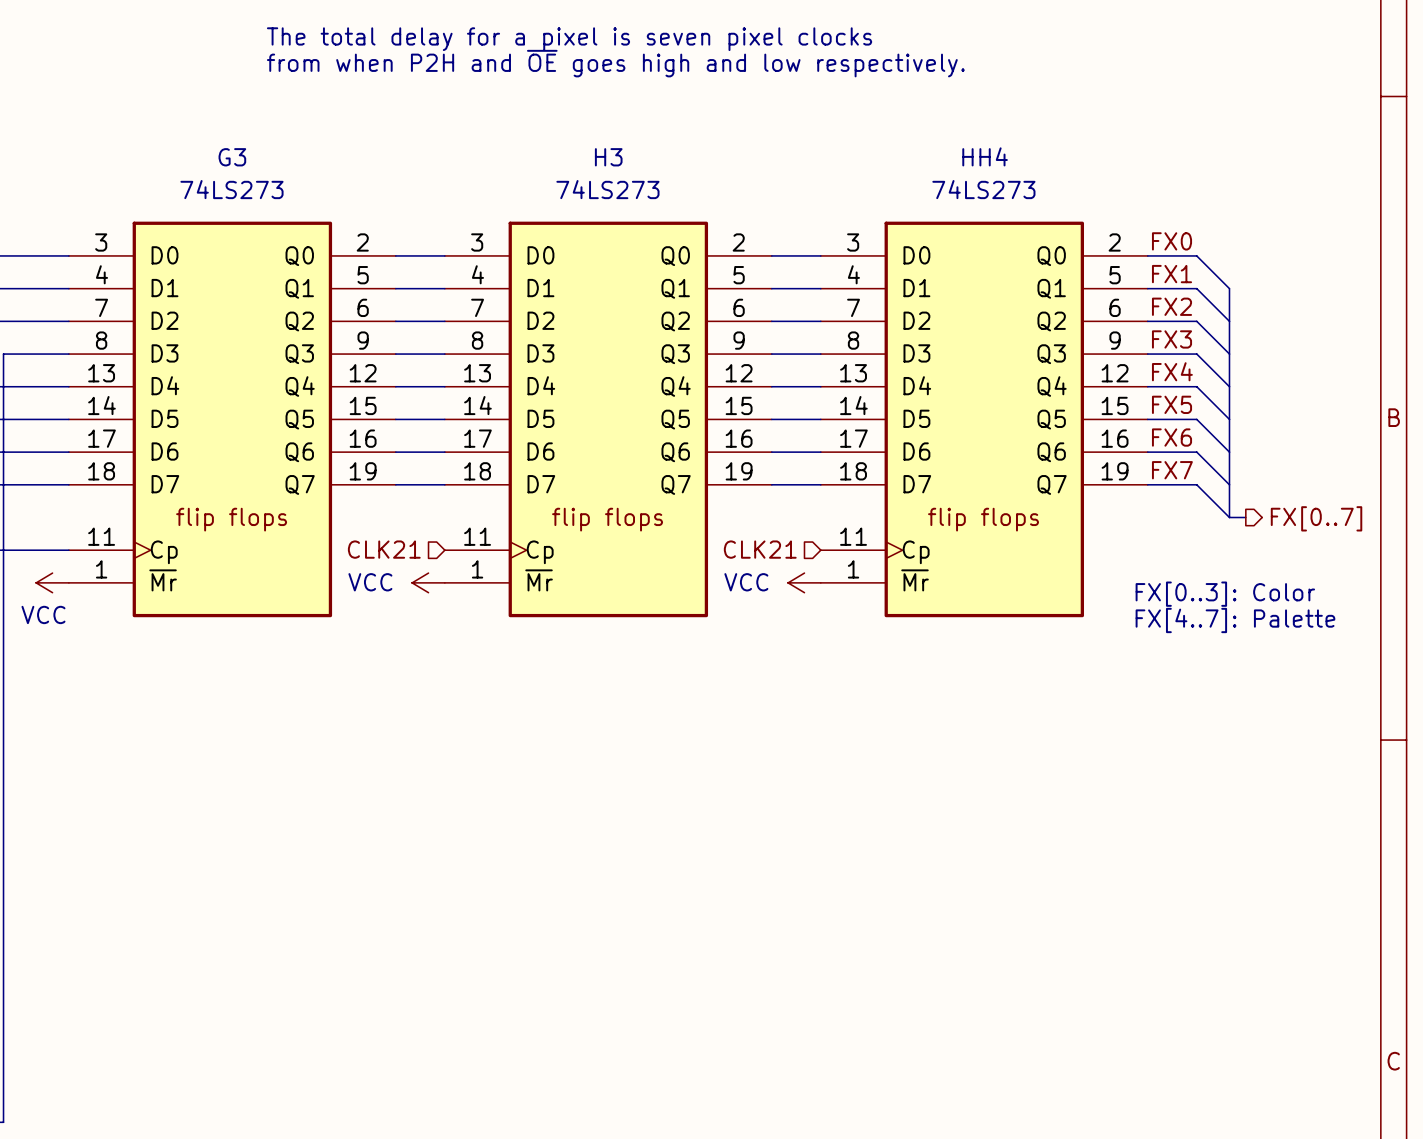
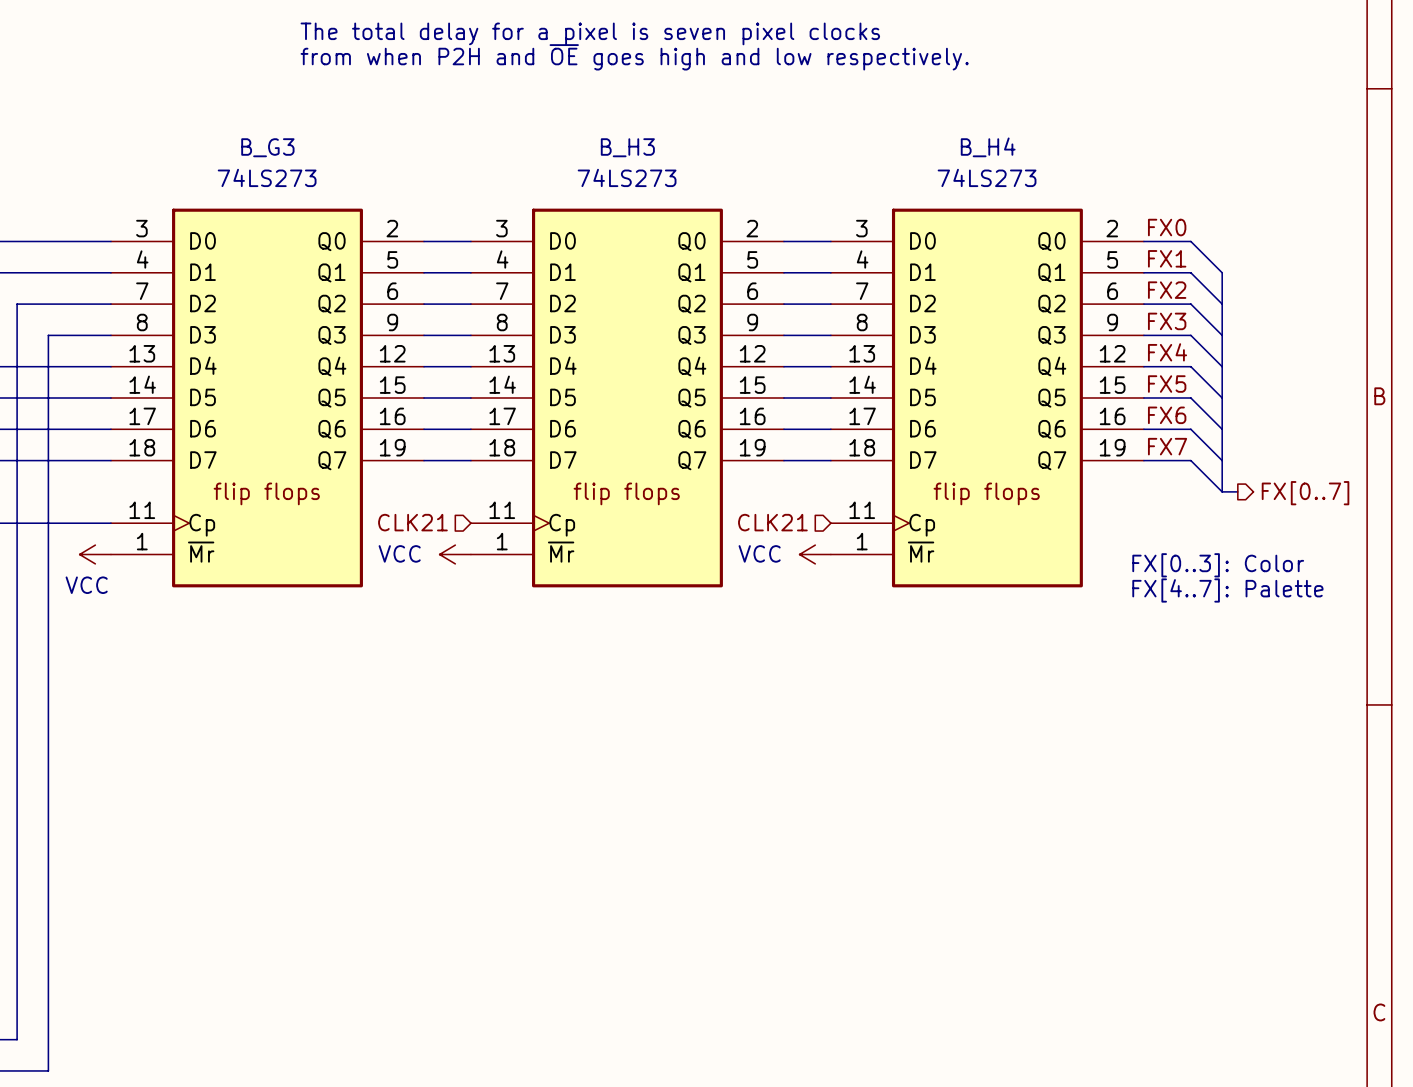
HH4 name: HH4 (985, 156) -> B_H4 (988, 147)
G3 name: G3 (232, 157) -> B_G3 (267, 147)
H3 name: H3 (608, 157) -> B_H3 (627, 147)

